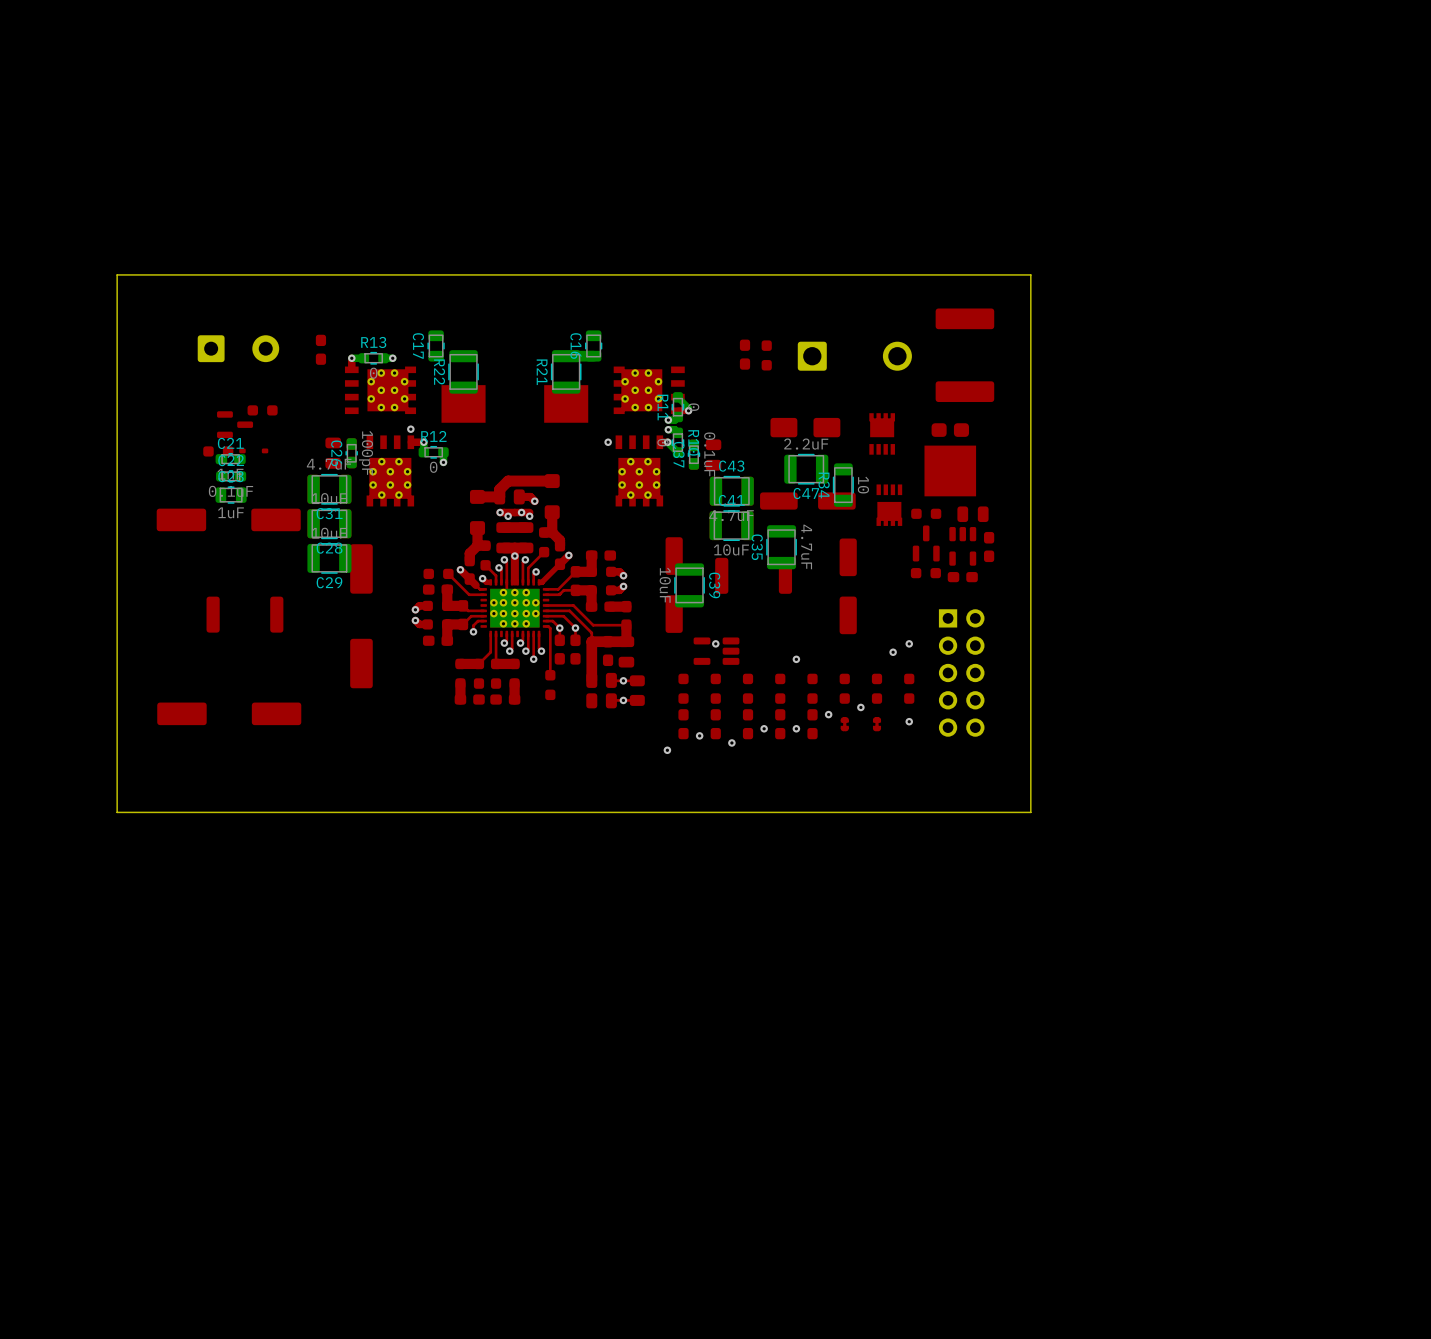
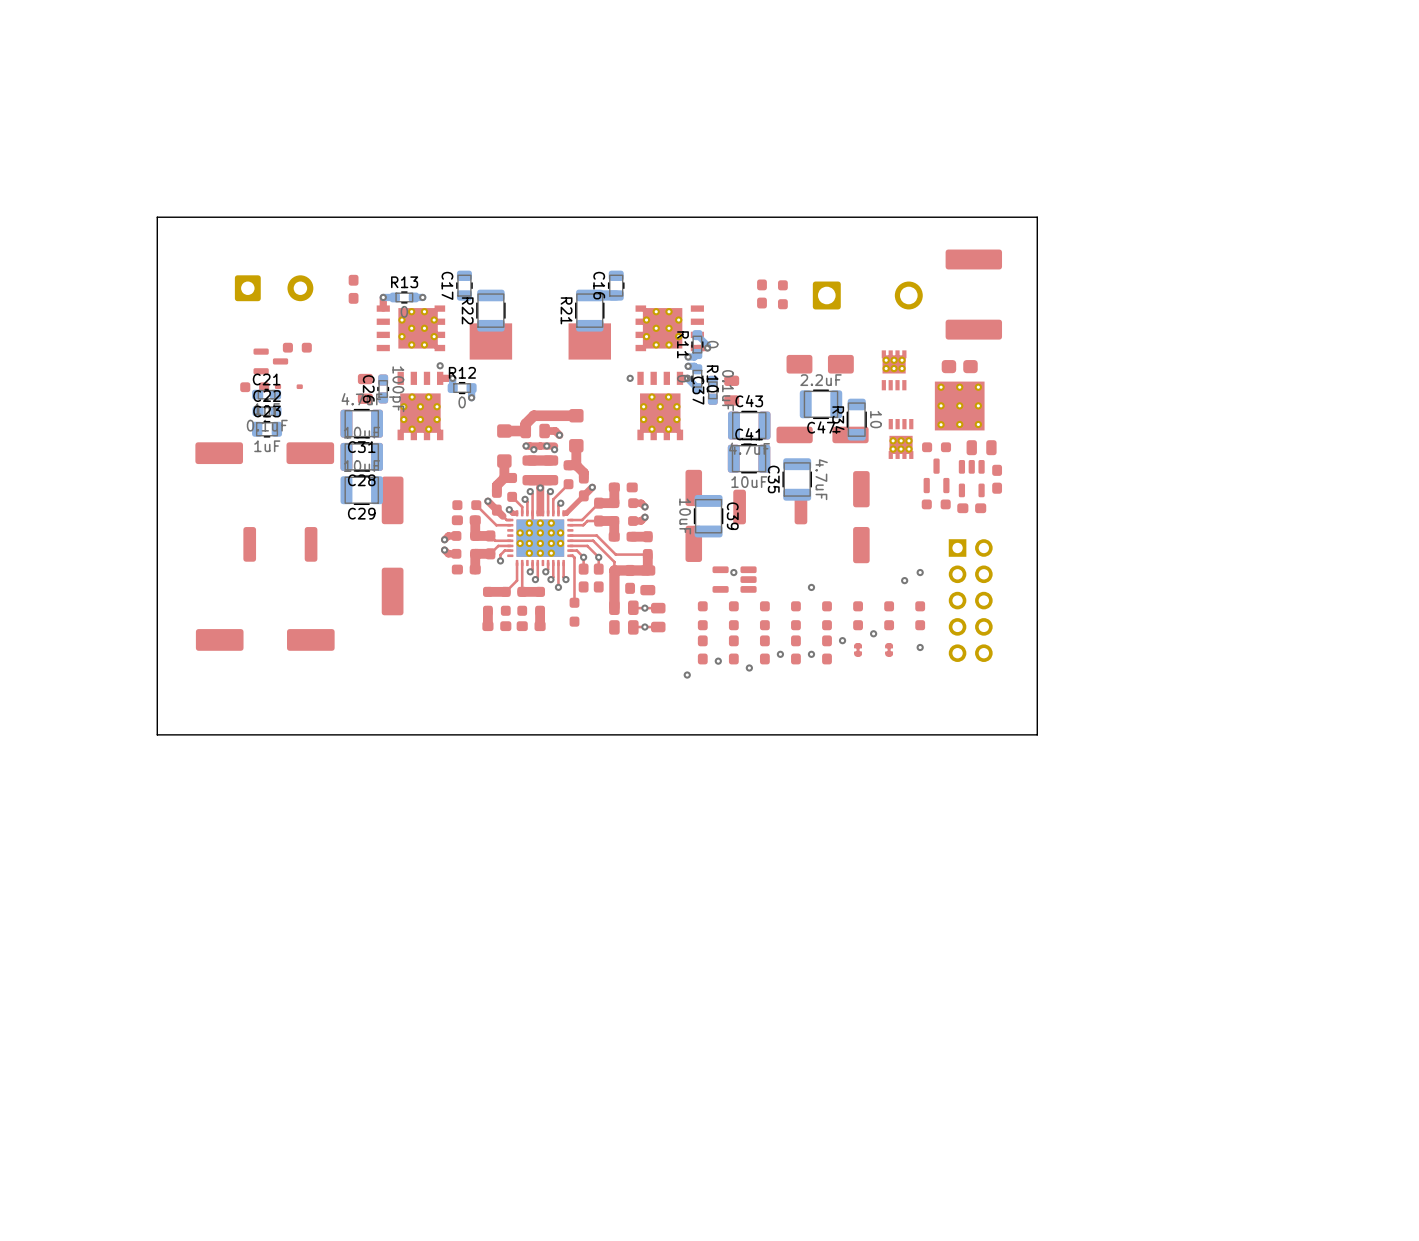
part footprint: [869, 413, 896, 455] -> [881, 350, 907, 391]
part footprint: [924, 423, 977, 497] -> [934, 360, 985, 431]
part footprint: [876, 484, 903, 526] -> [888, 419, 914, 459]

